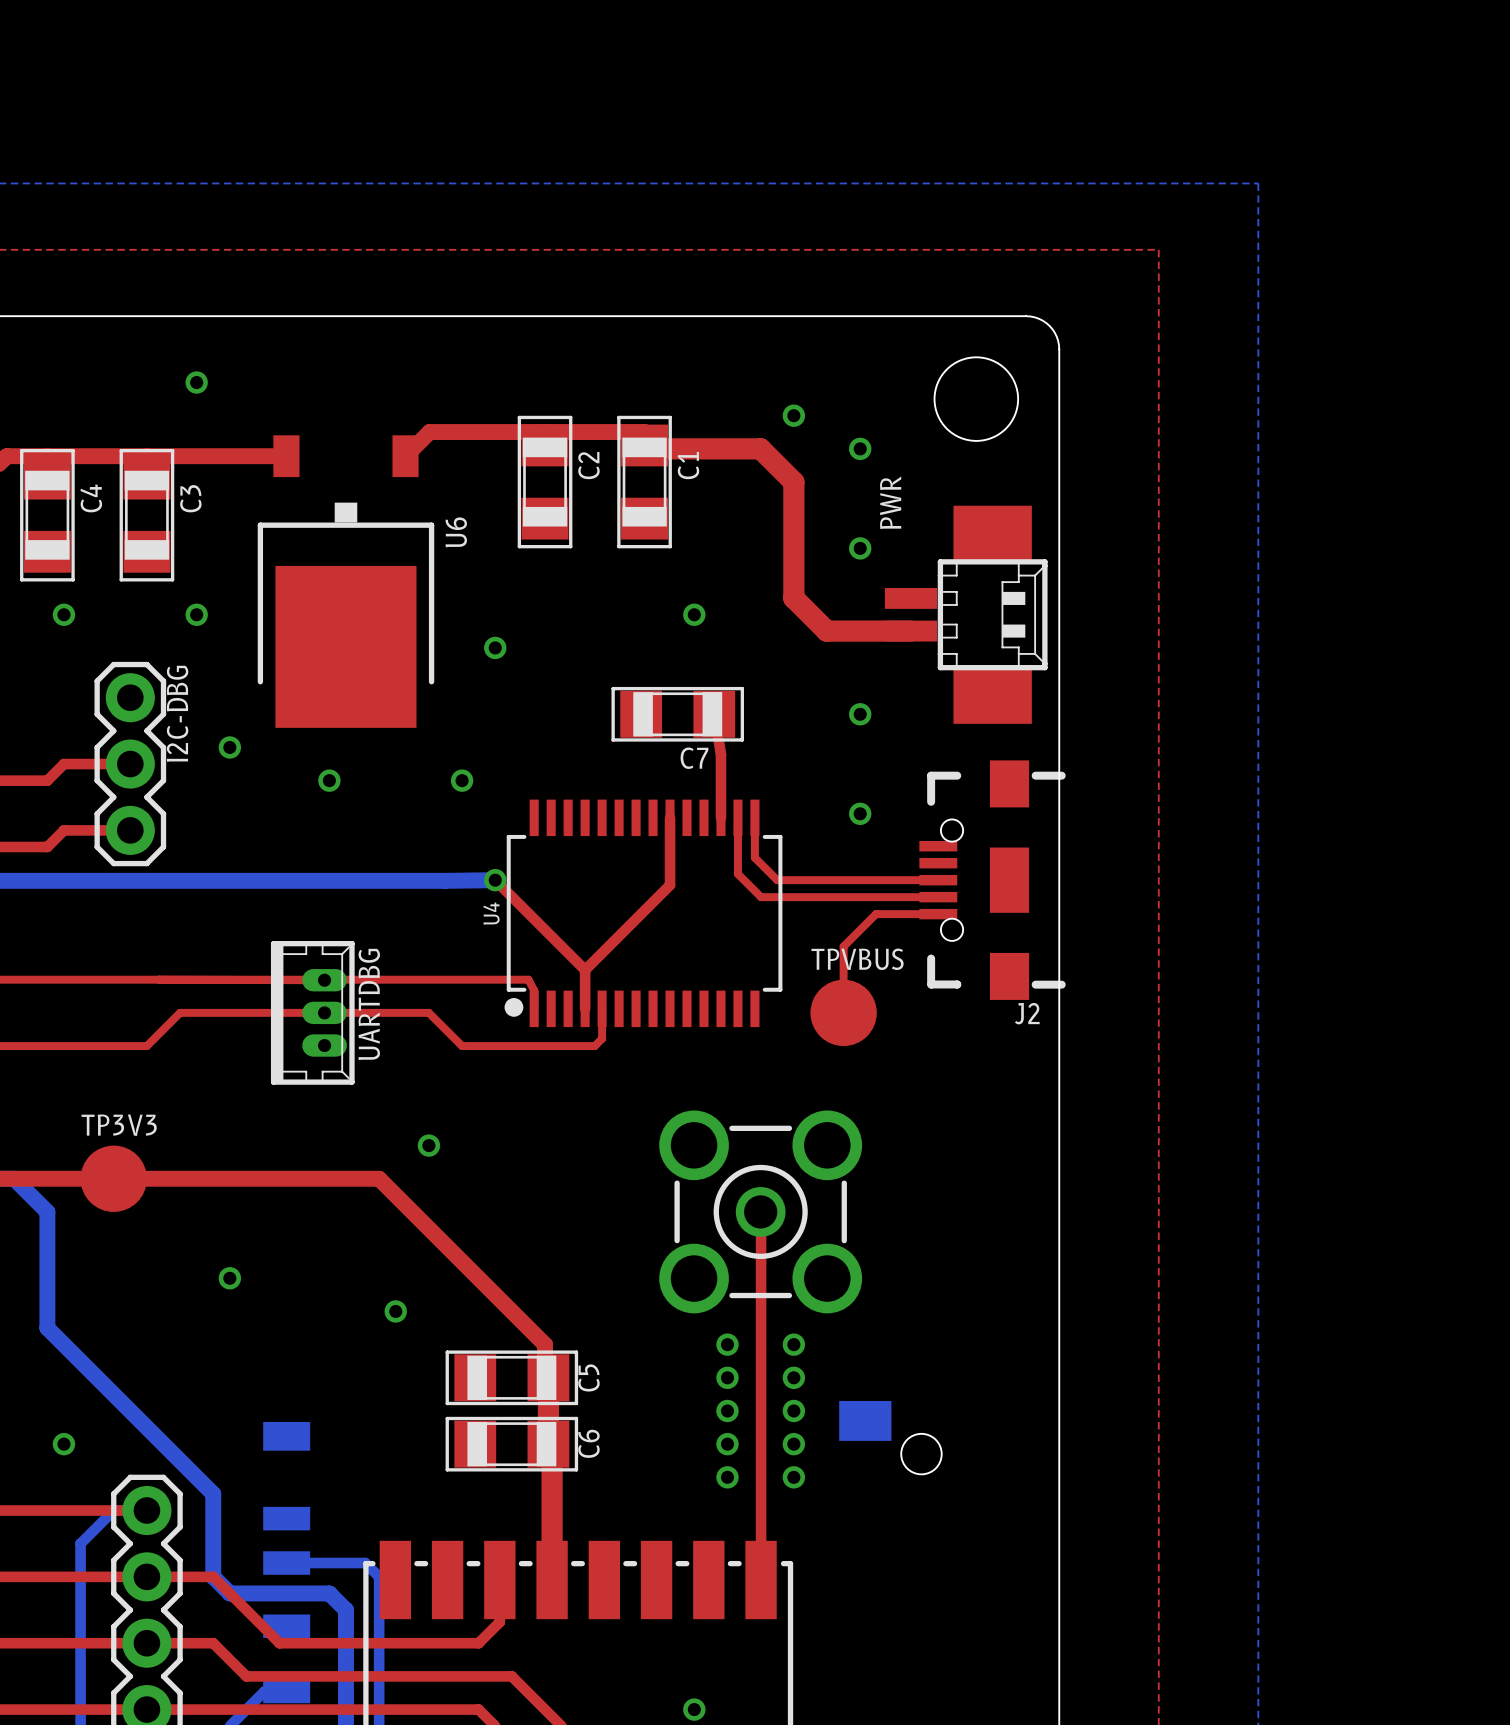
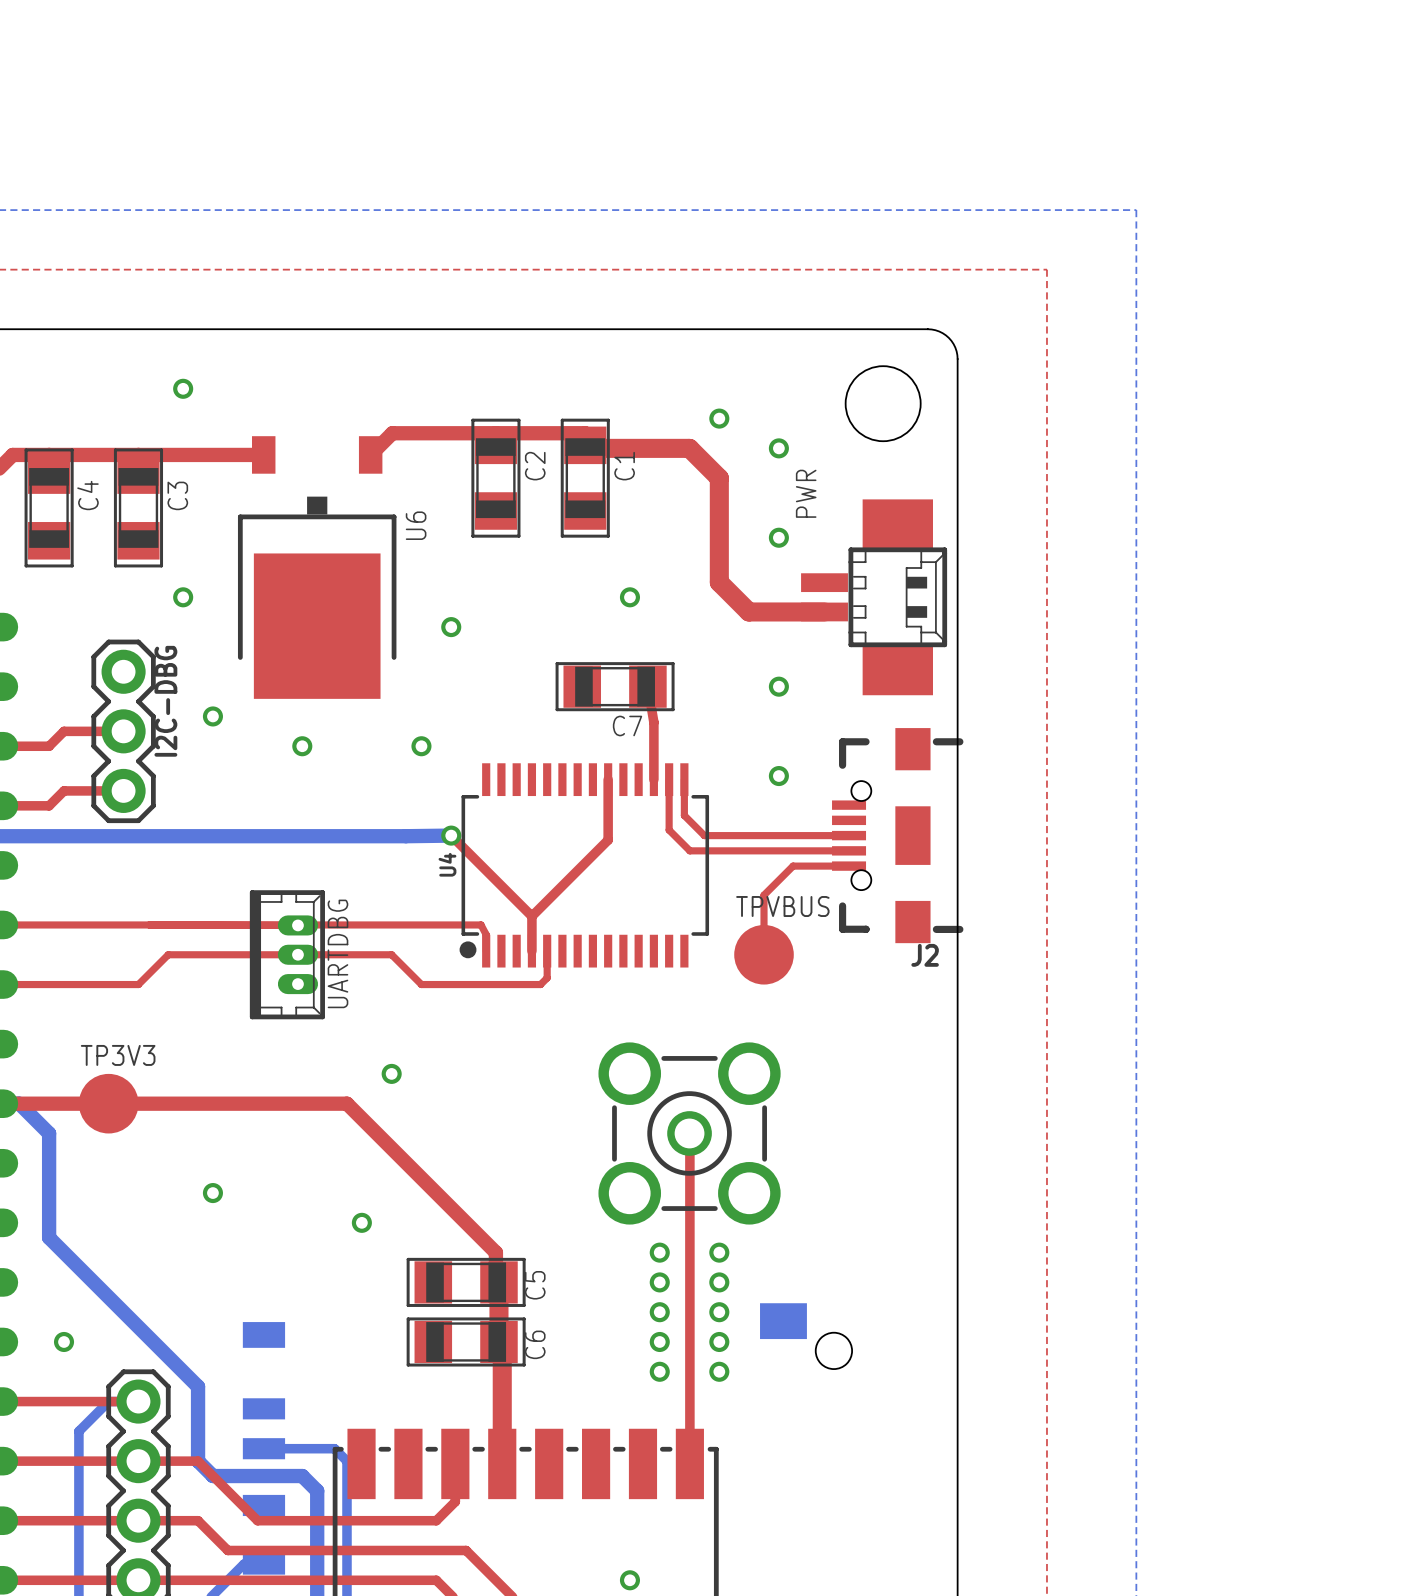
via: (63, 614) -> none

